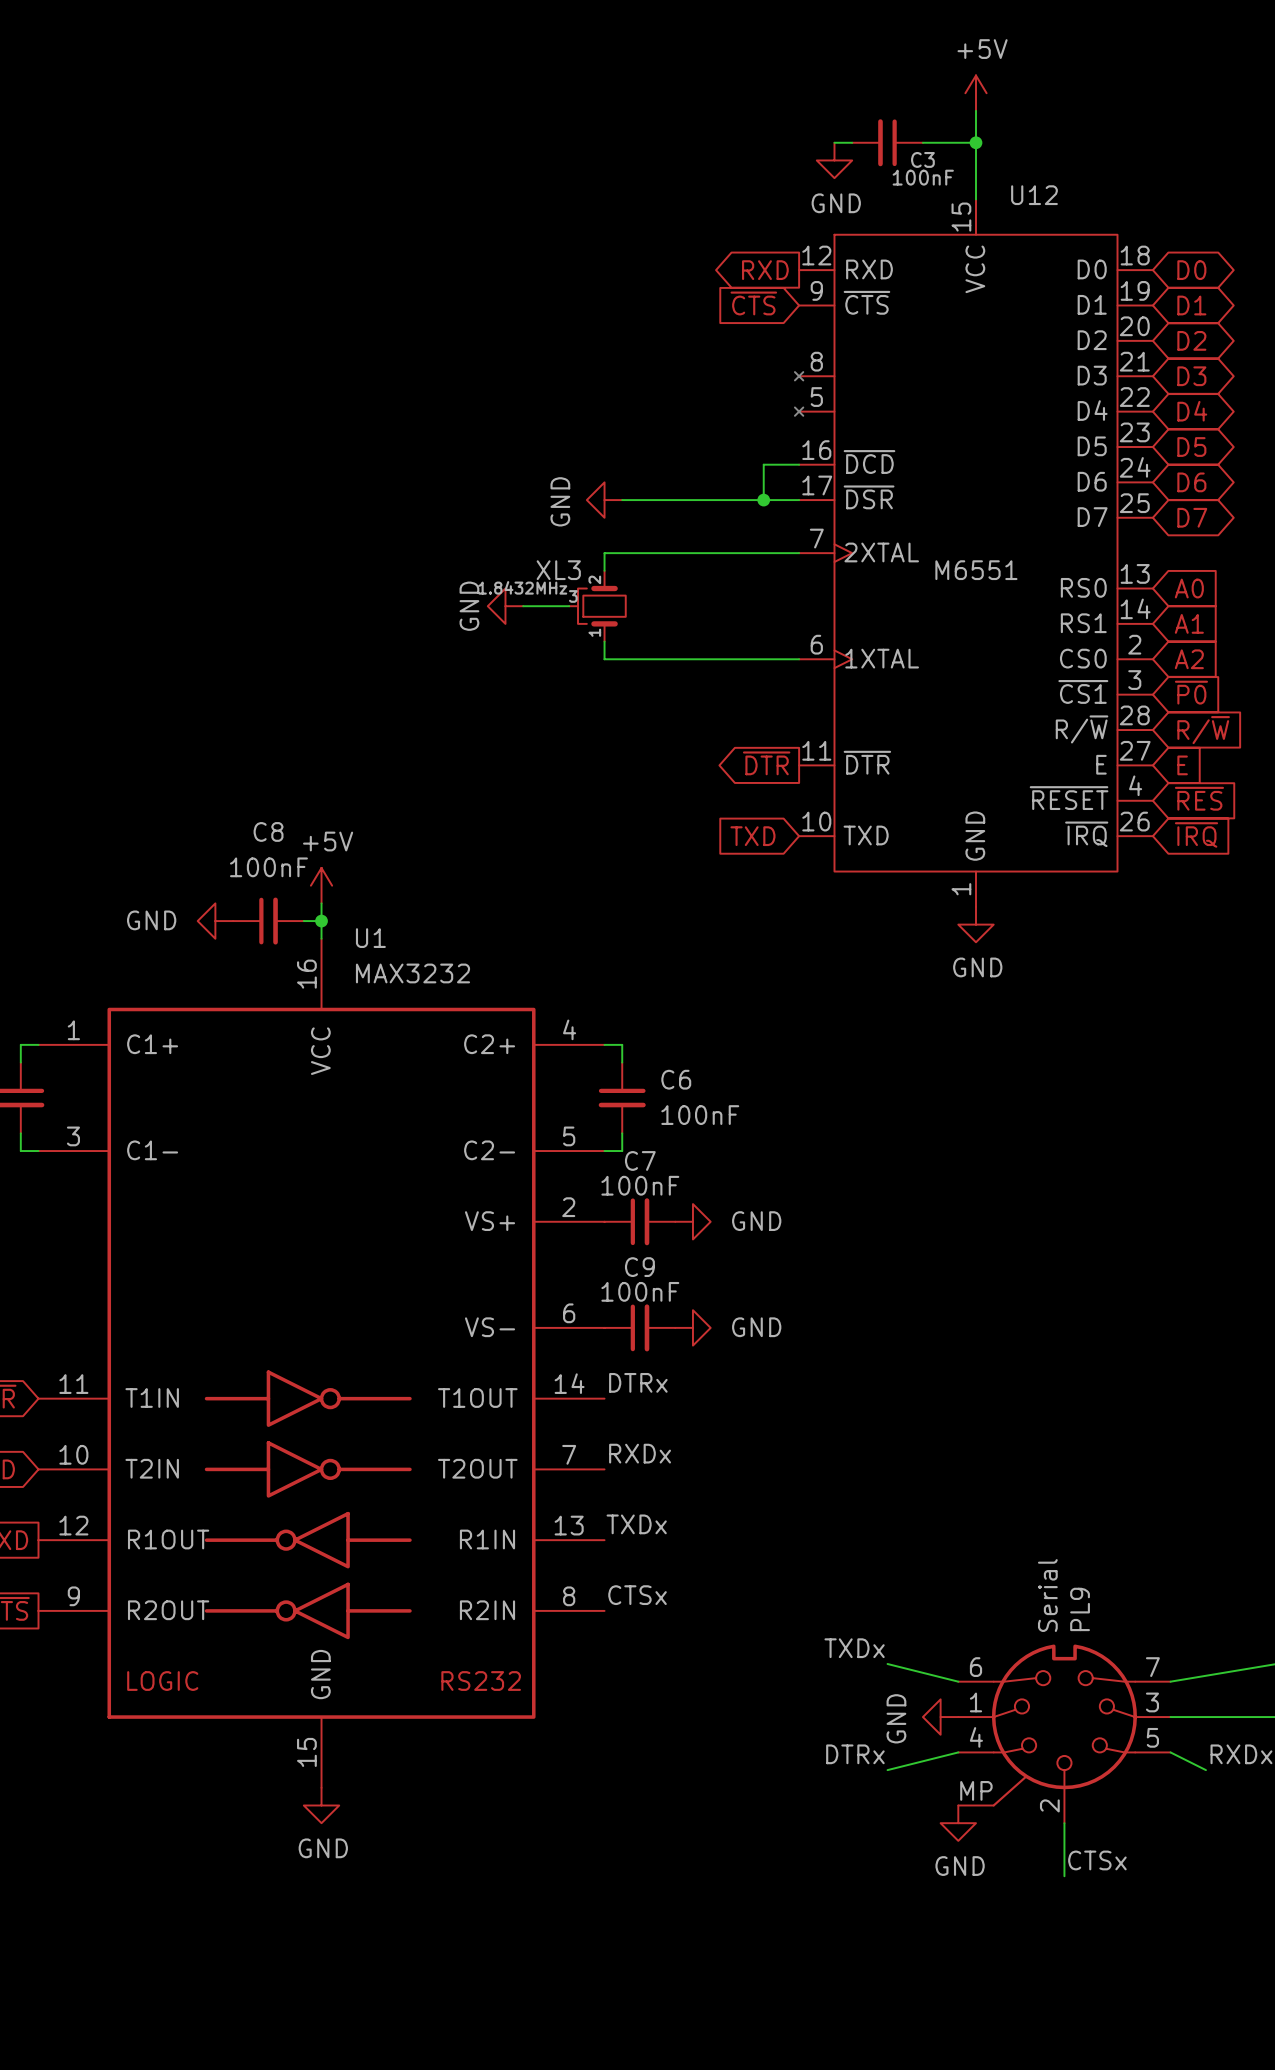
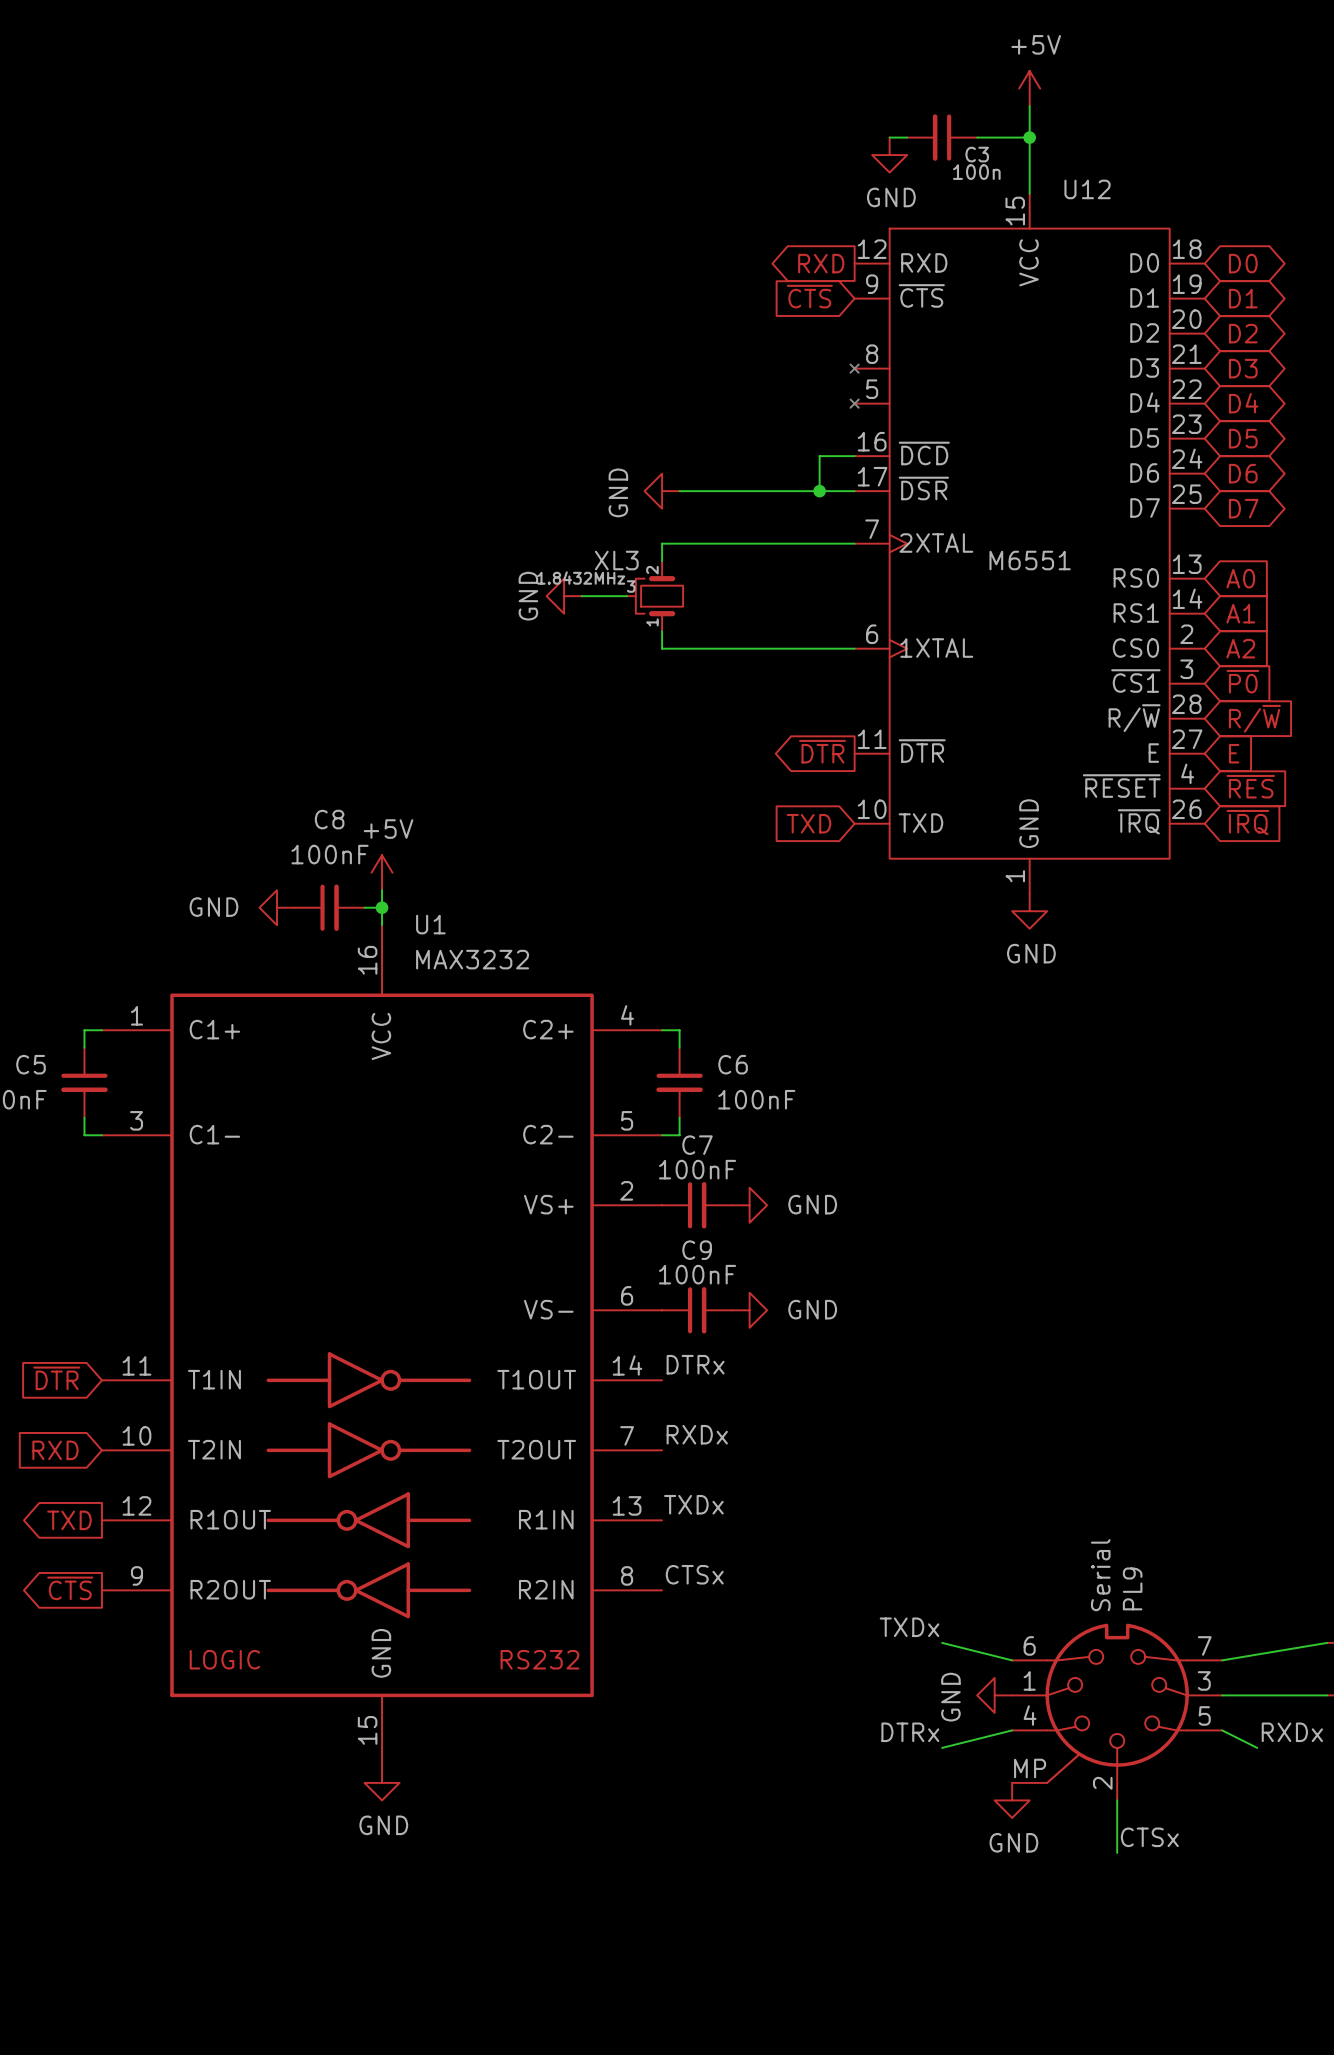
C3 value: 100nF (923, 177) -> 100n (976, 172)

